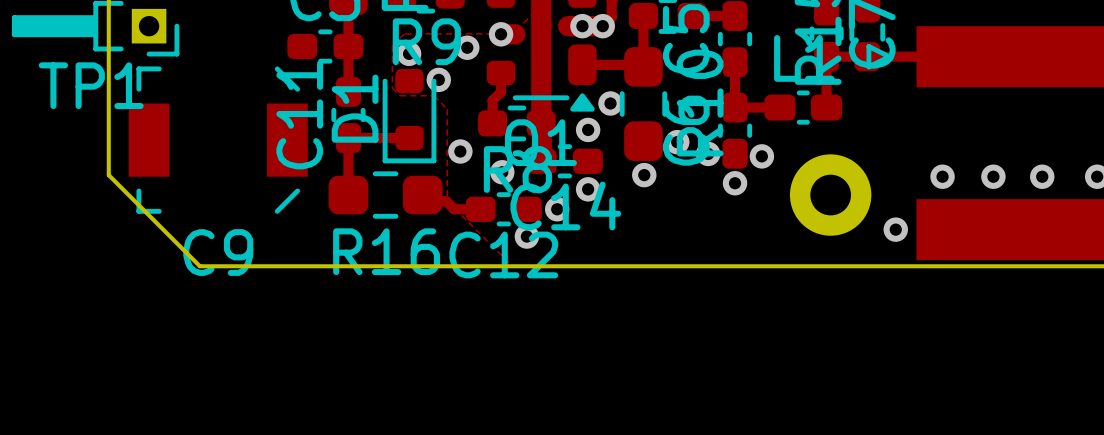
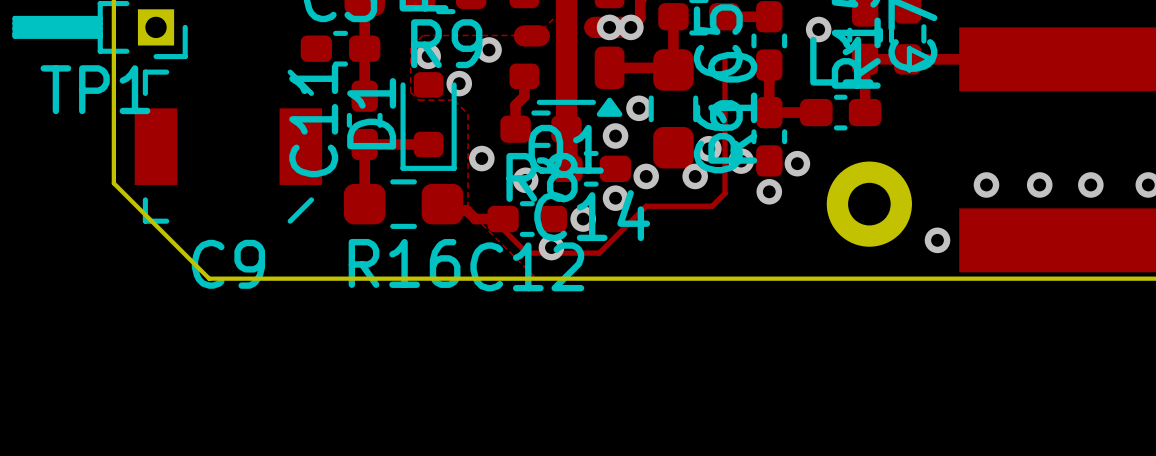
via: none -> (818, 29)
via: (501, 34) -> none
track: none -> (724, 59) (724, 193) (712, 206) (646, 206) (599, 253) (526, 253) (503, 229) (503, 219)
via: none -> (646, 176)
via position: (644, 175) -> (695, 176)

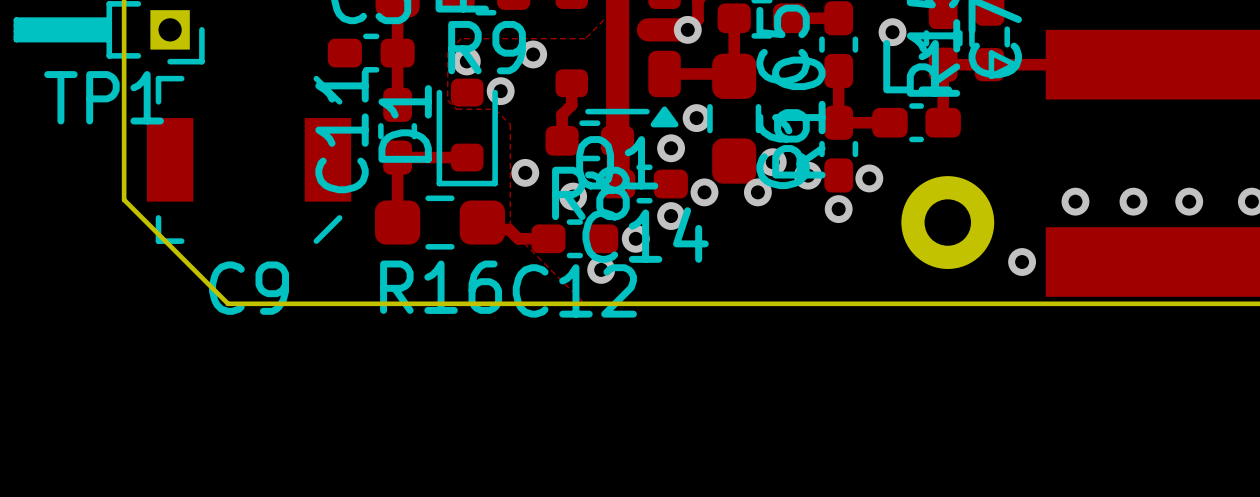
via: (609, 27) -> none
track: (524, 35) (539, 35) -> none
track: (724, 59) (724, 193) (712, 206) (646, 206) (599, 253) (526, 253) (503, 229) (503, 219) -> none

